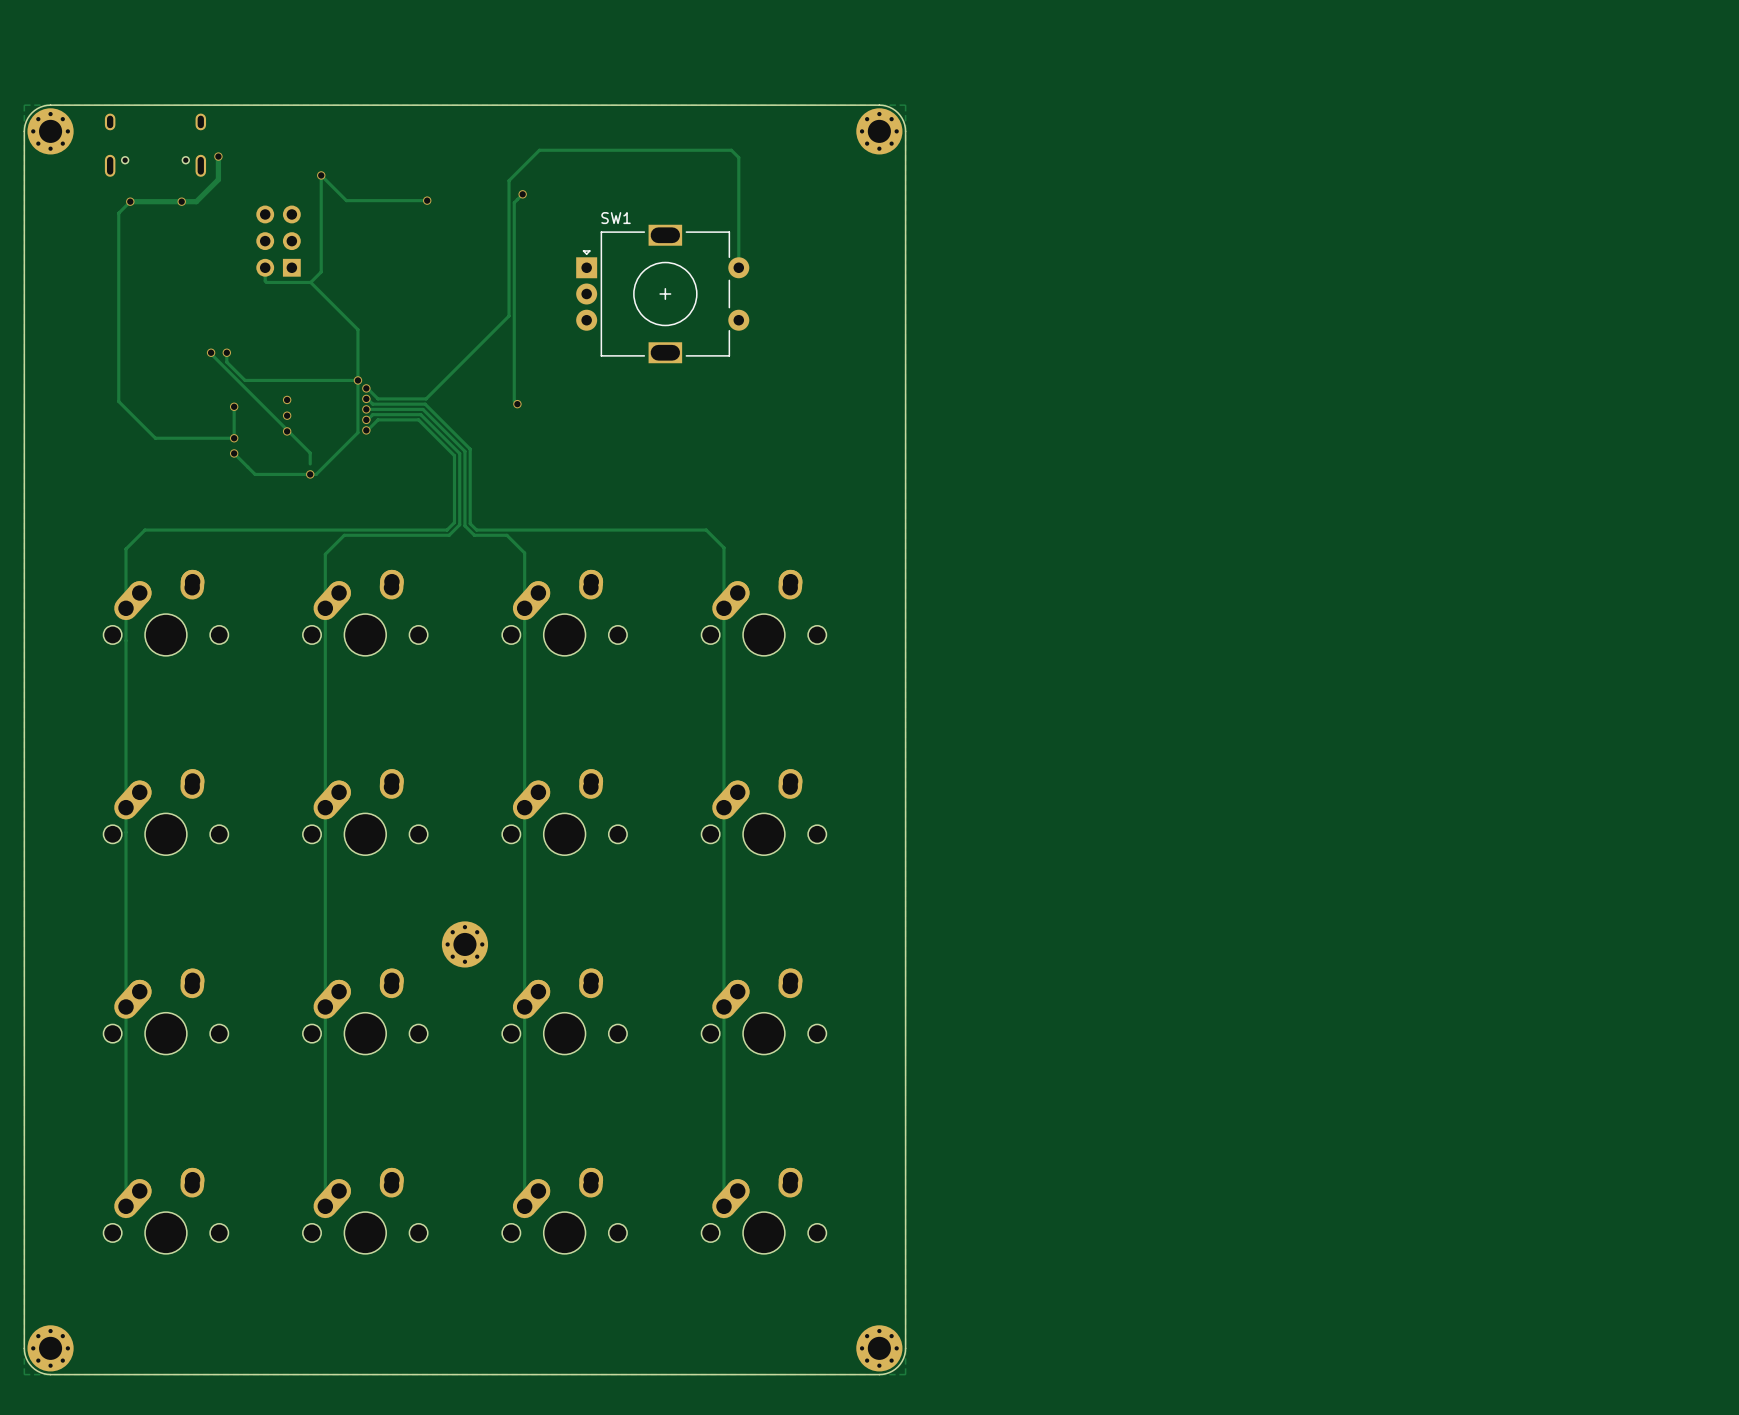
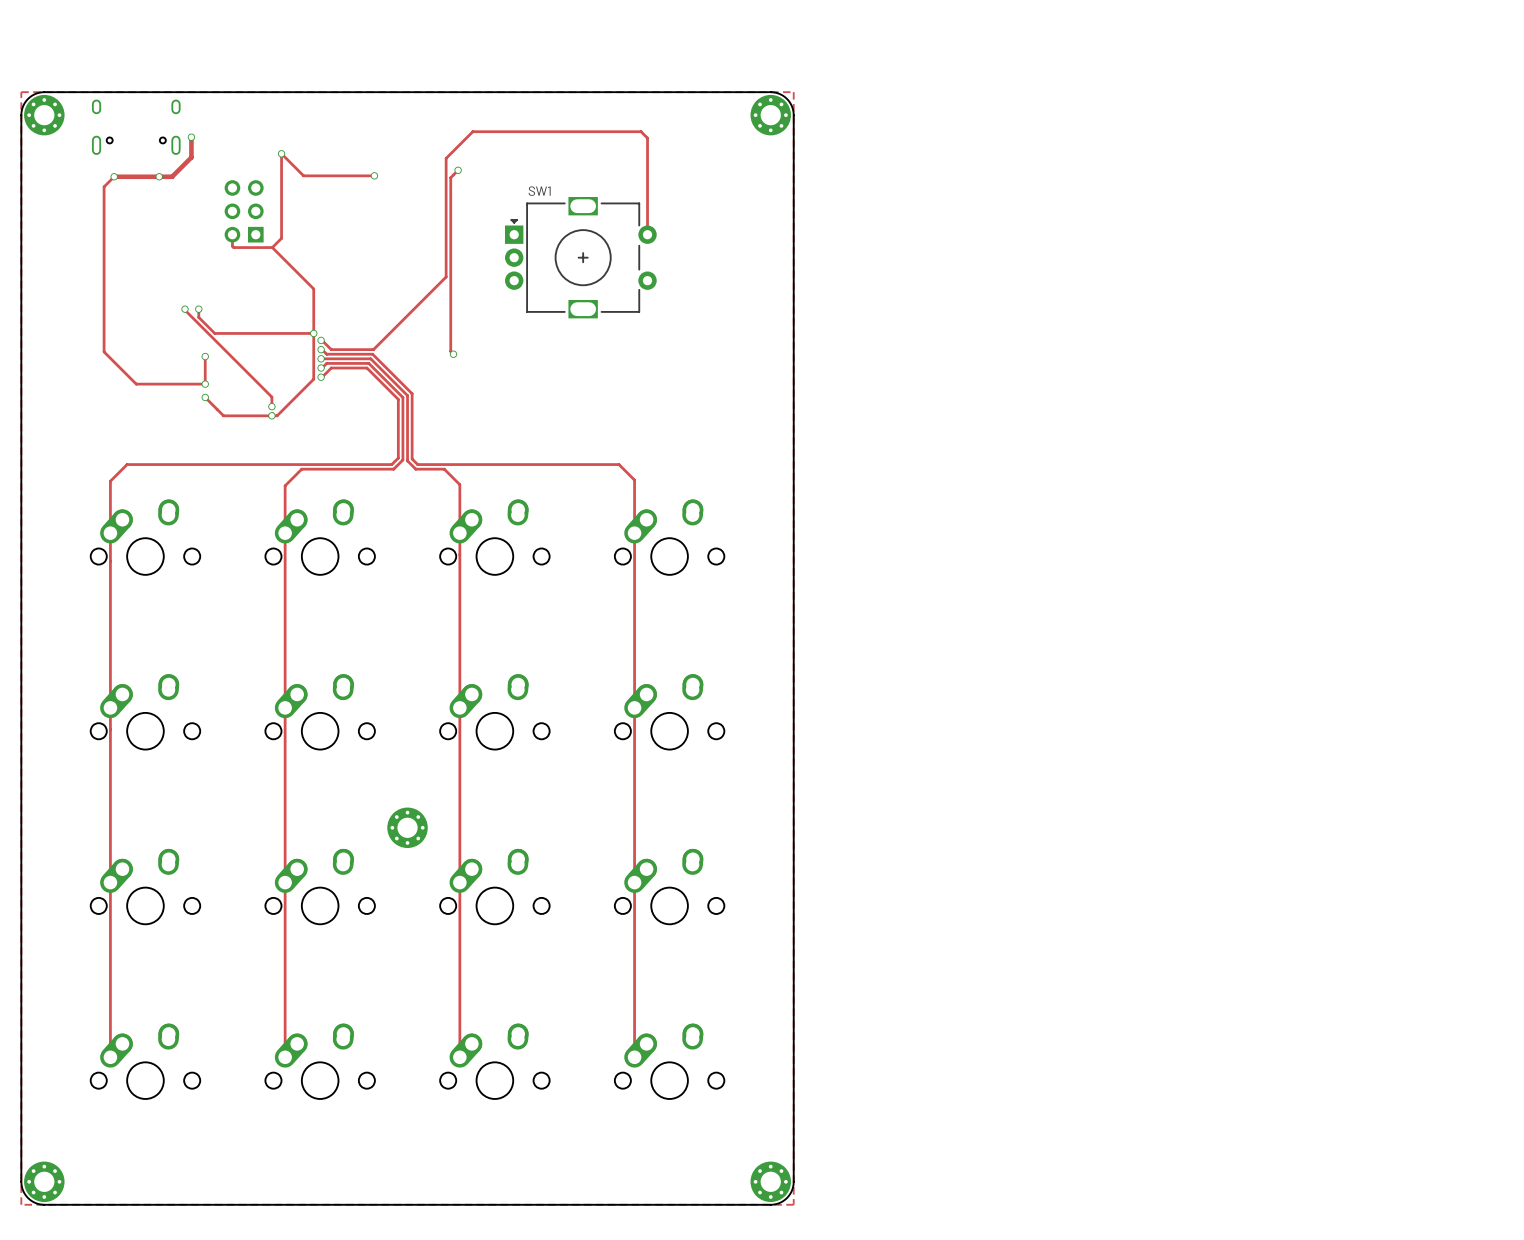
via: (287, 399) -> none
via: (287, 415) -> none
via: (287, 431) -> none
via: none -> (271, 406)

